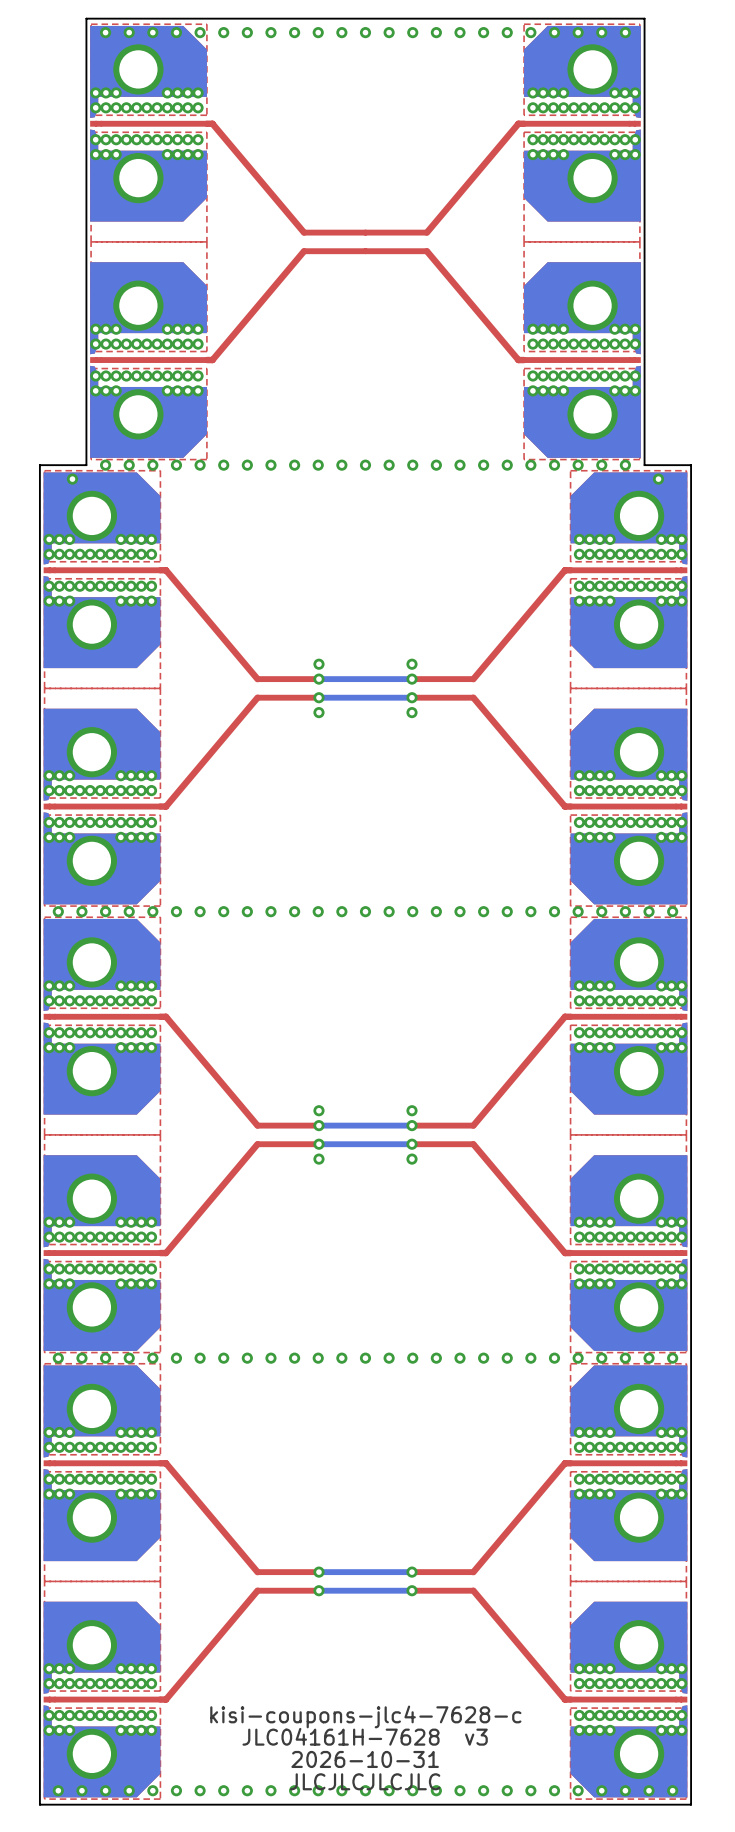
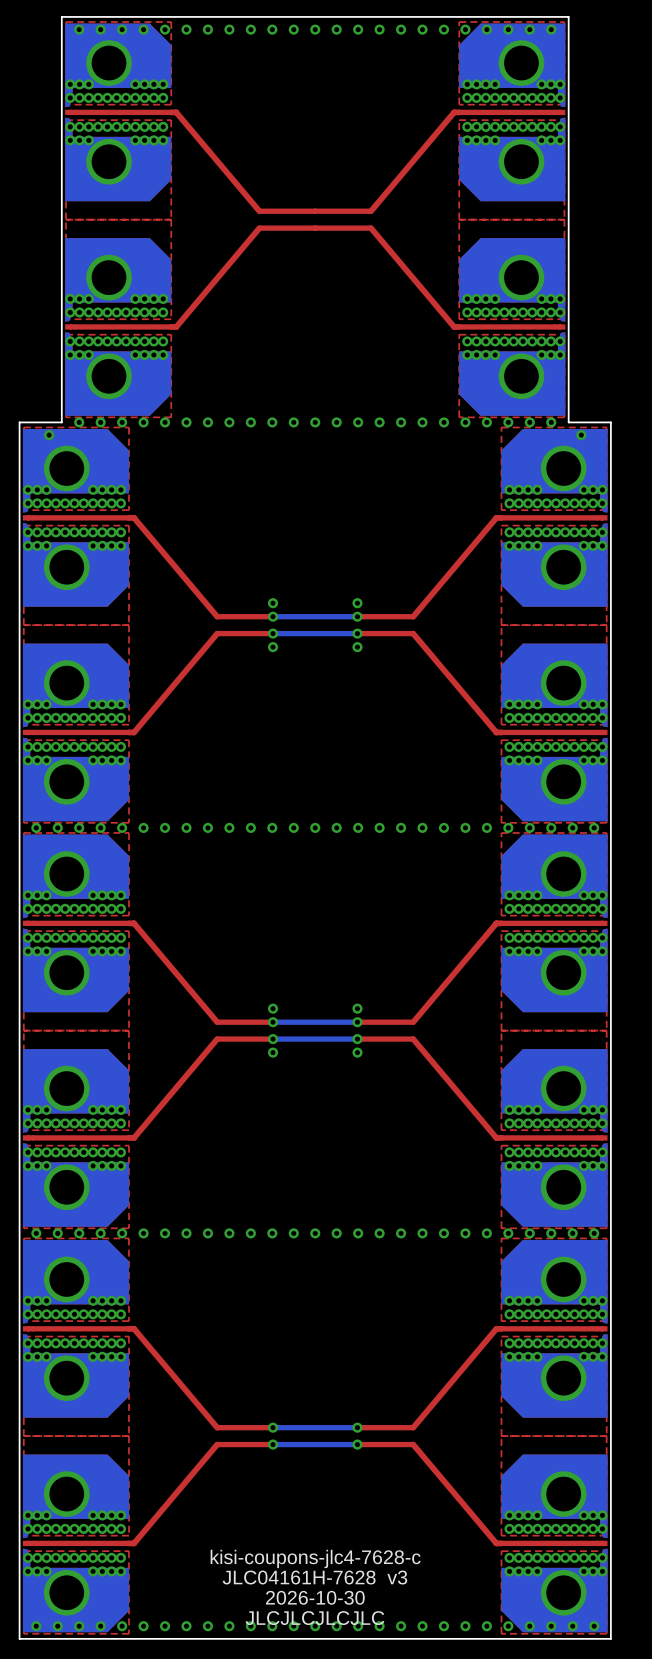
text: 2026-10-31 (365, 1759) -> 2026-10-30 (315, 1597)

